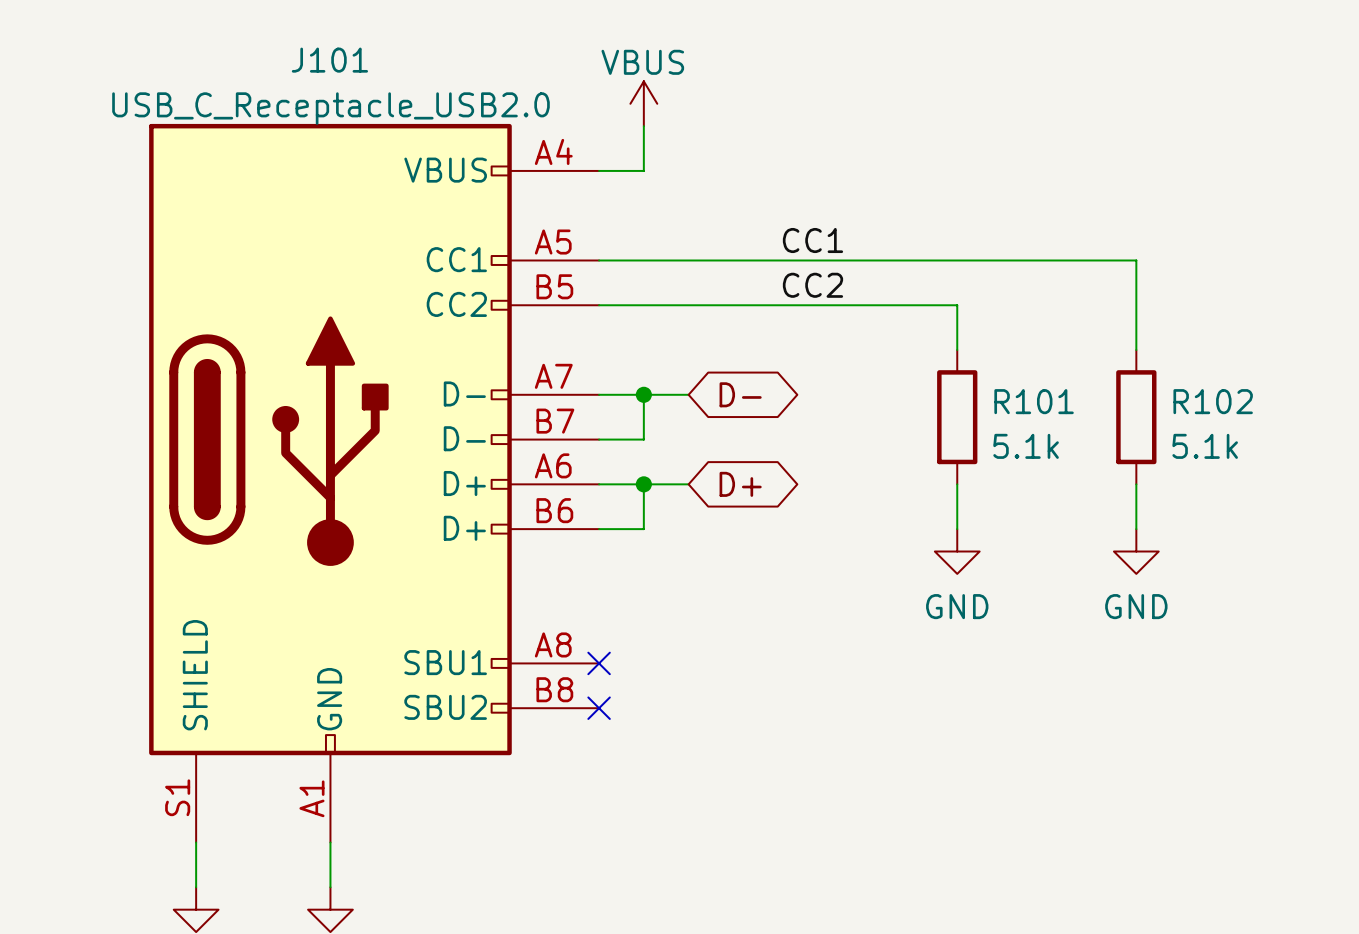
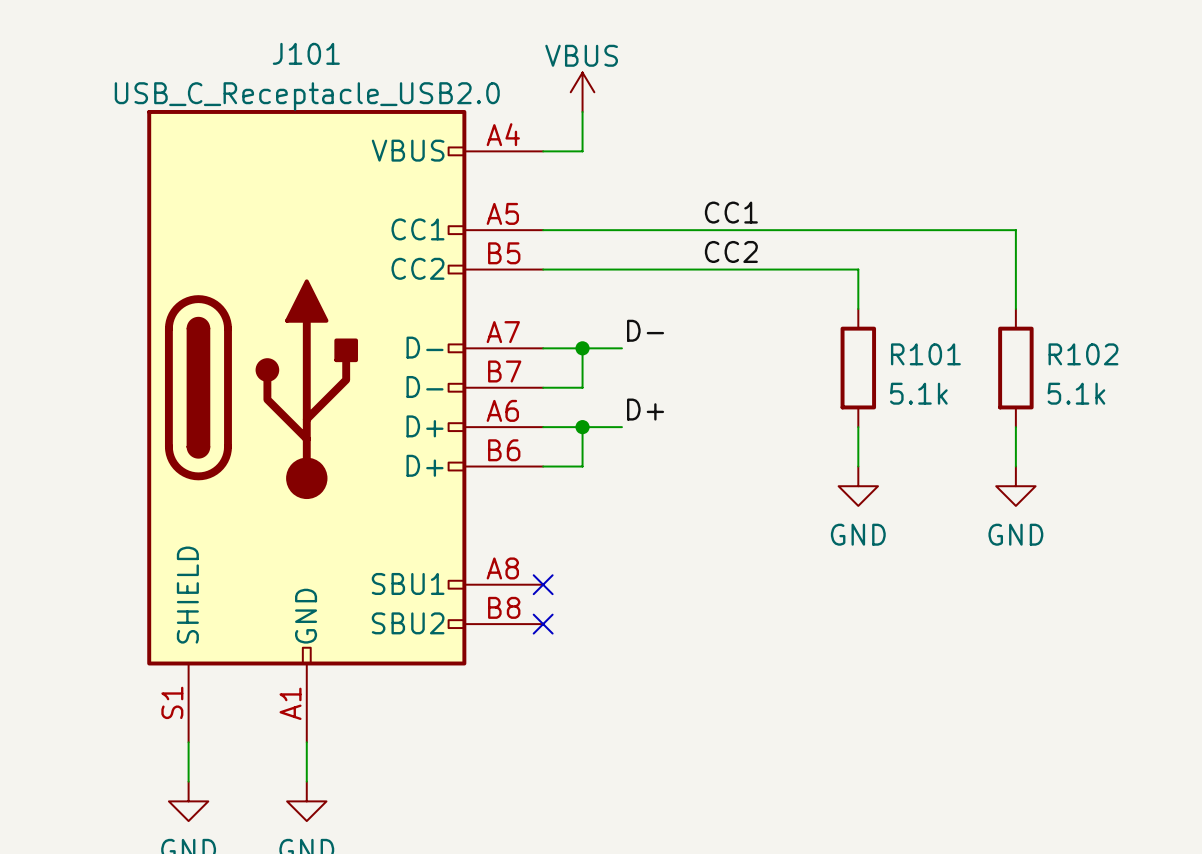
label: none -> D- (645, 330)
global label: D- (740, 394) -> none
label: none -> D+ (645, 409)
global label: D+ (740, 484) -> none

